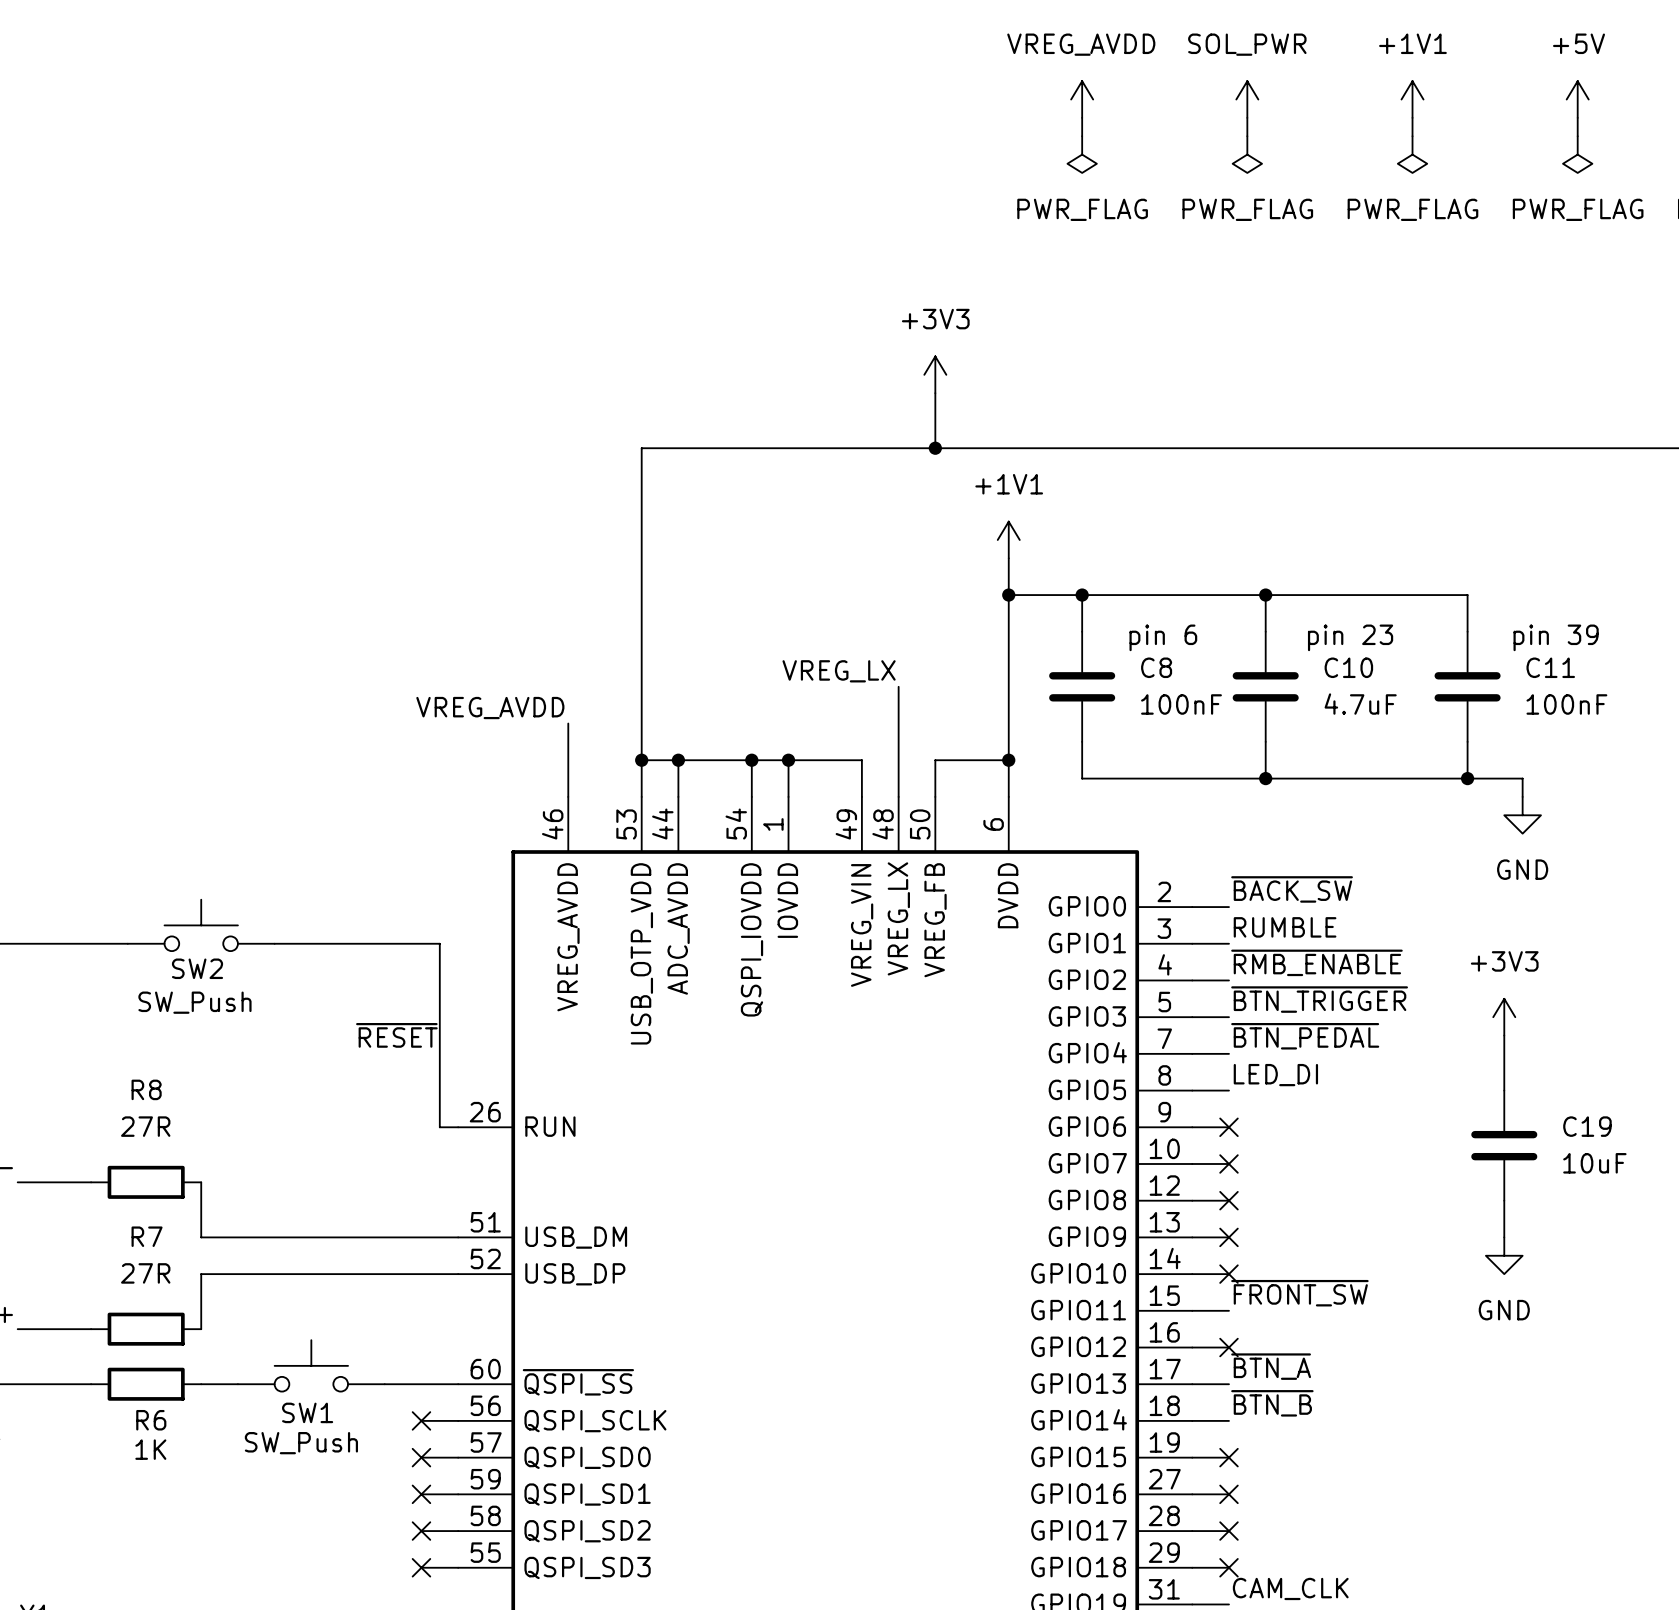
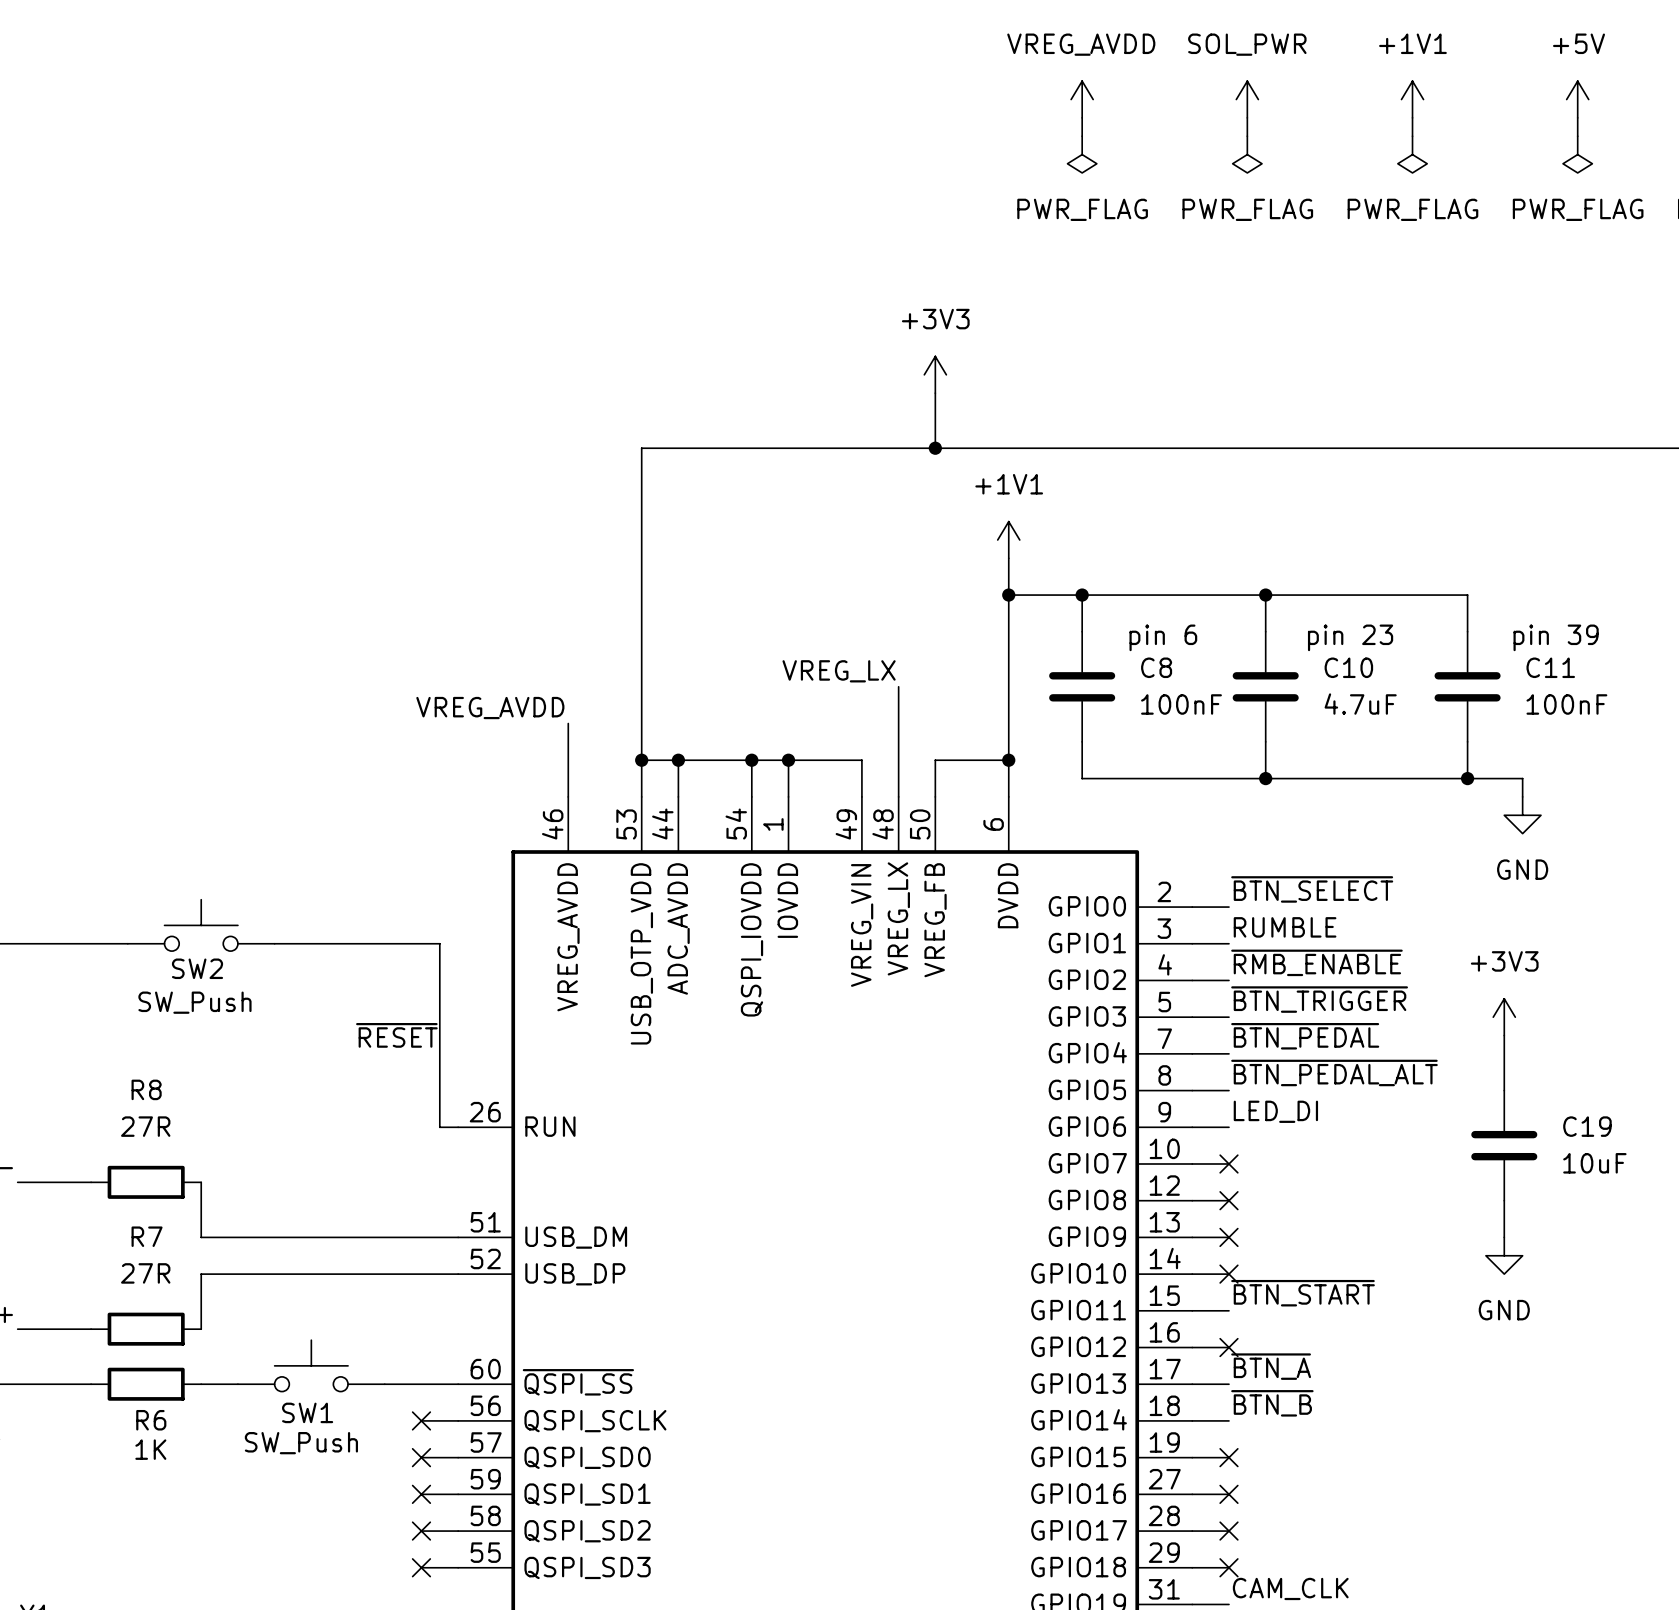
label: ~{BACK_SW} (1292, 889) -> ~{BTN_SELECT} (1312, 889)
label: LED_DI (1275, 1075) -> ~{BTN_PEDAL_ALT} (1334, 1072)
label: none -> LED_DI (1275, 1111)
no-connect mark: (1228, 1127) -> none
label: ~{FRONT_SW} (1299, 1293) -> ~{BTN_START} (1303, 1293)

